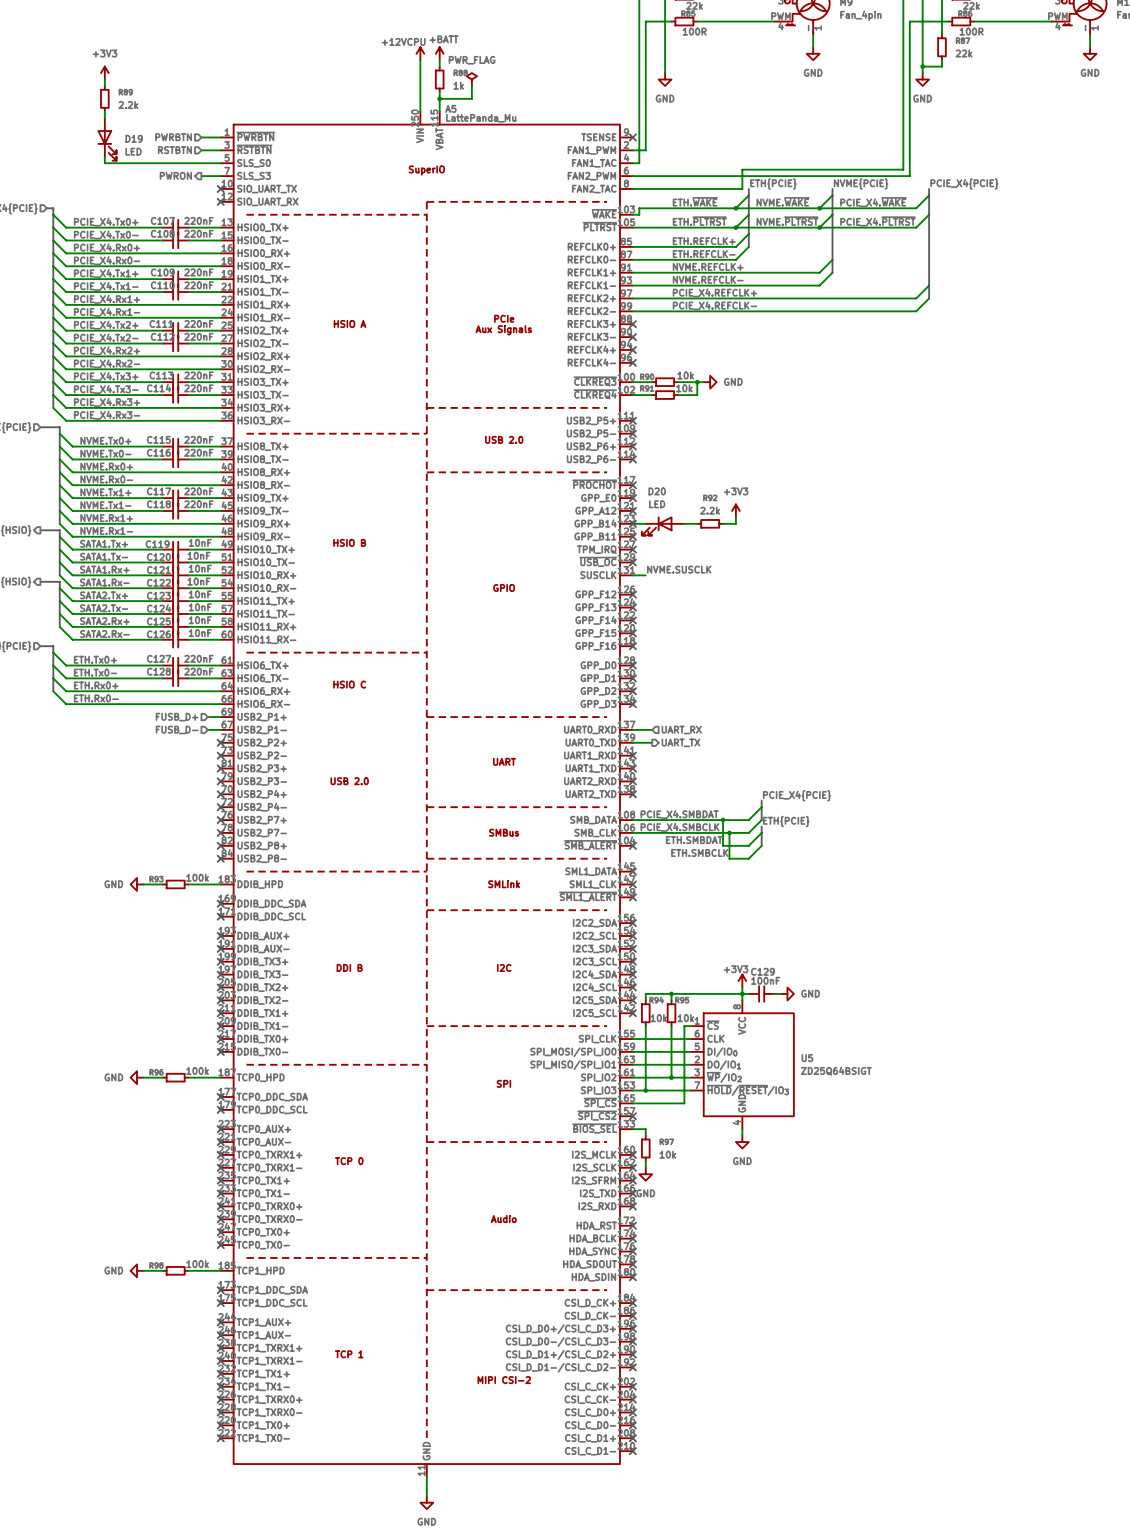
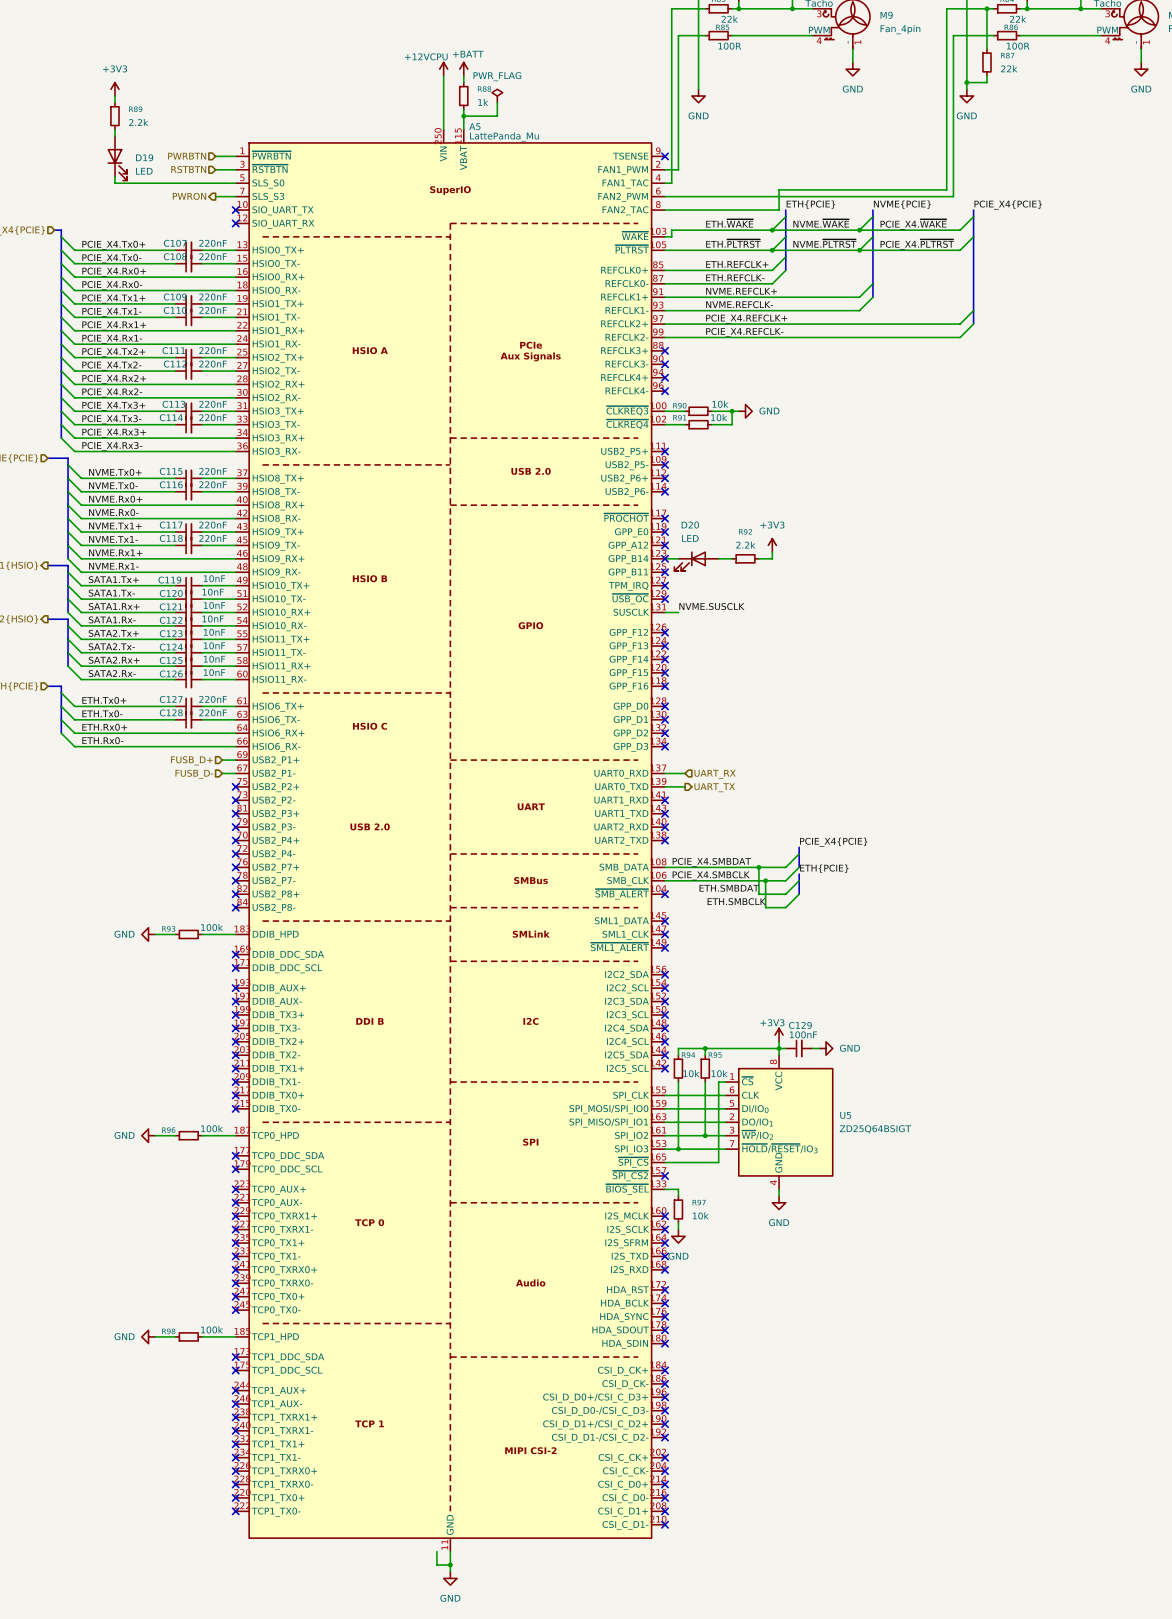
wire: none -> (436, 1551) (436, 1564) (450, 1564)
junction: none -> (450, 1564)

